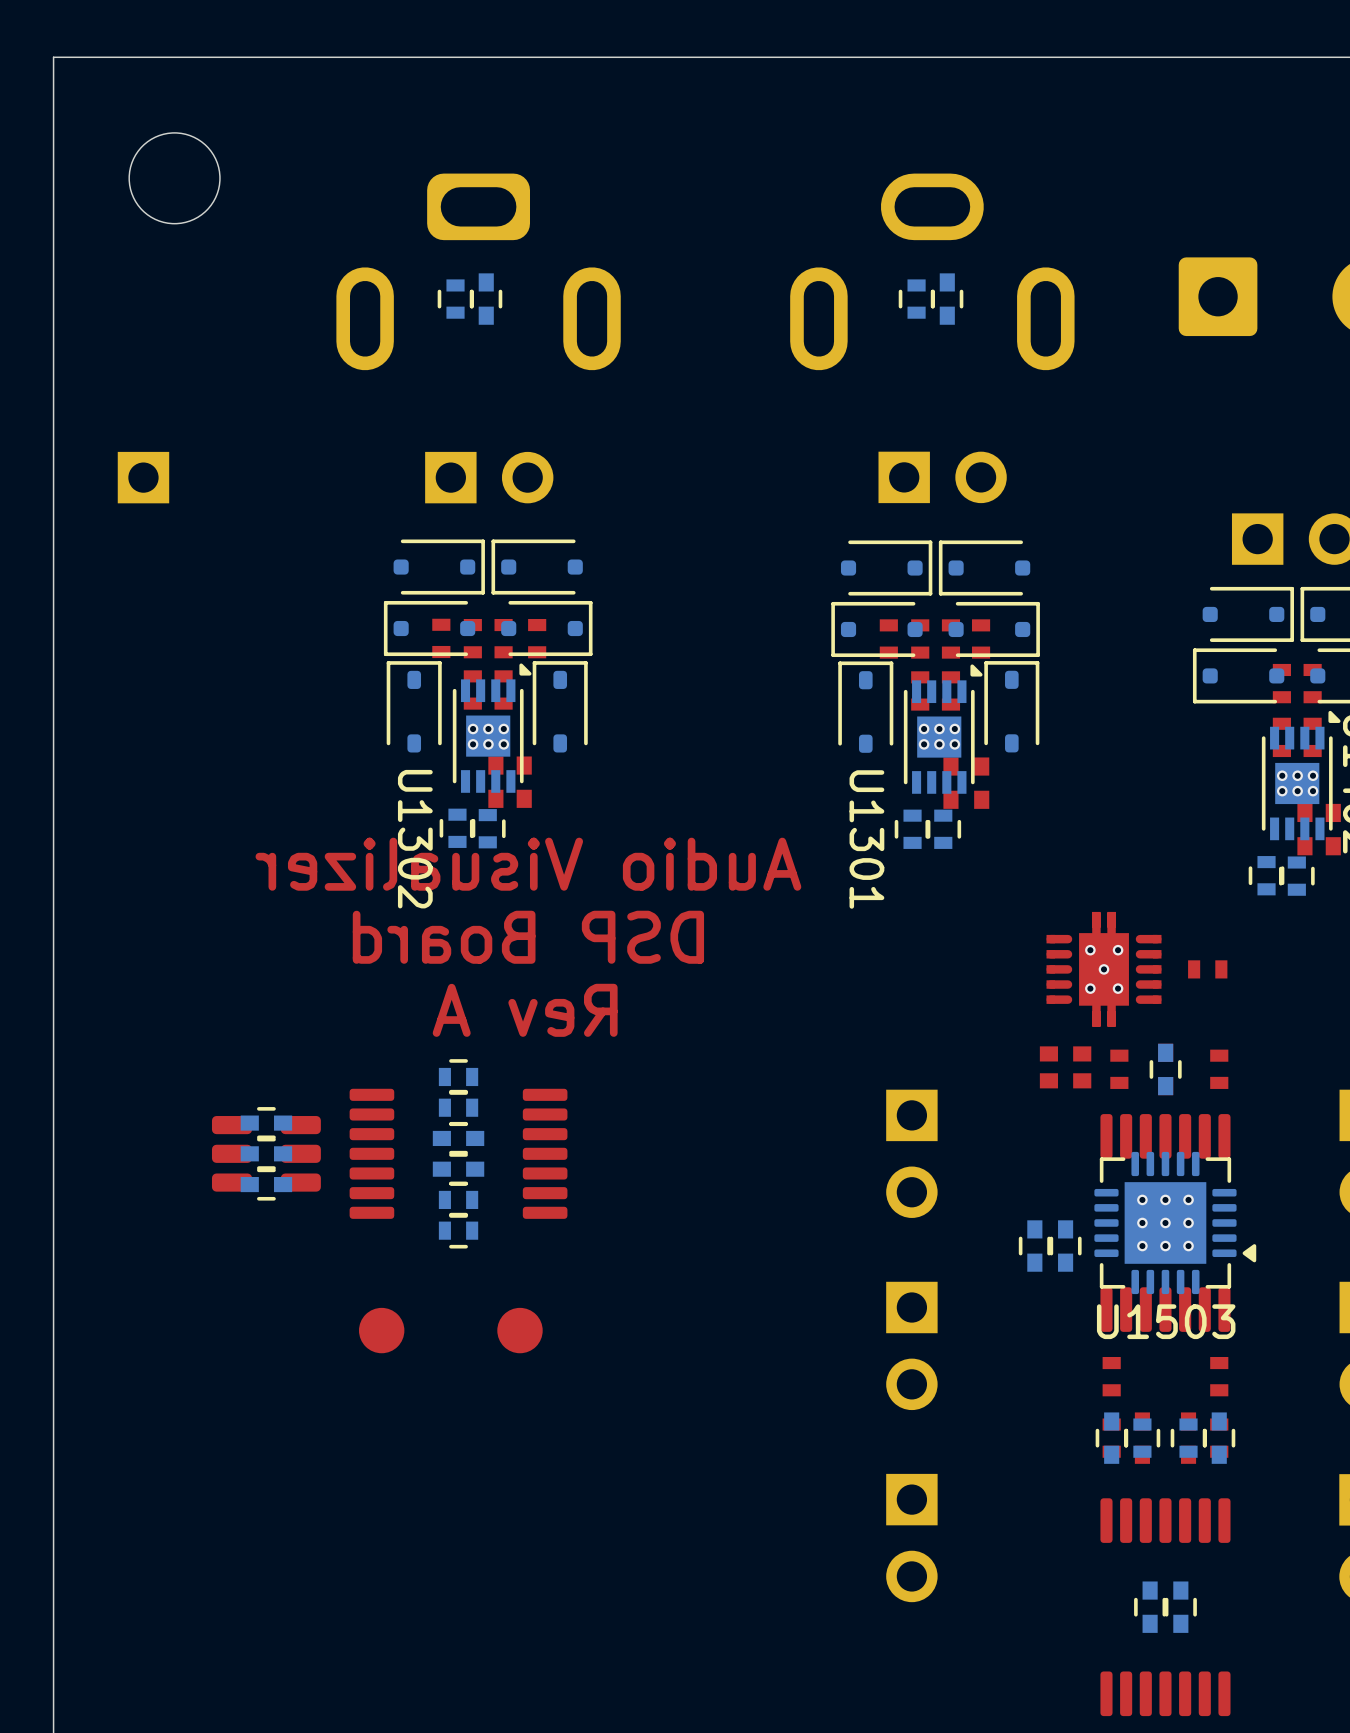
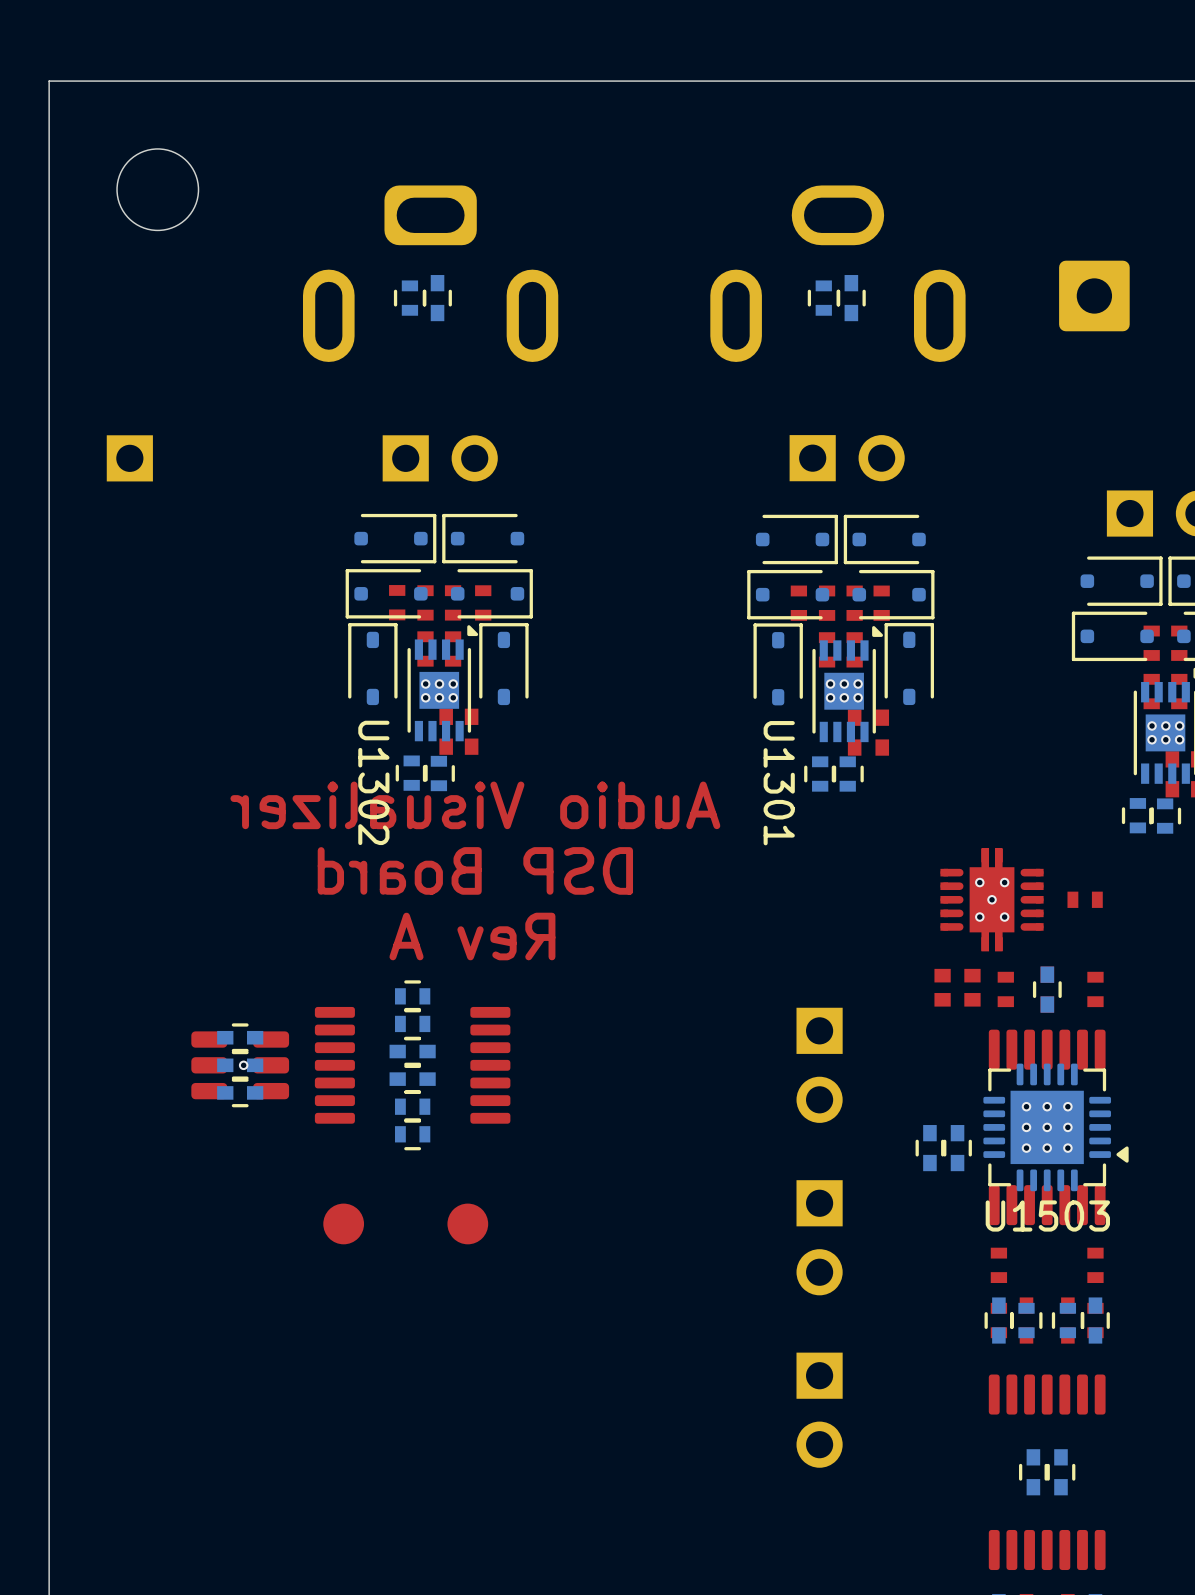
via: none -> (243, 1065)

